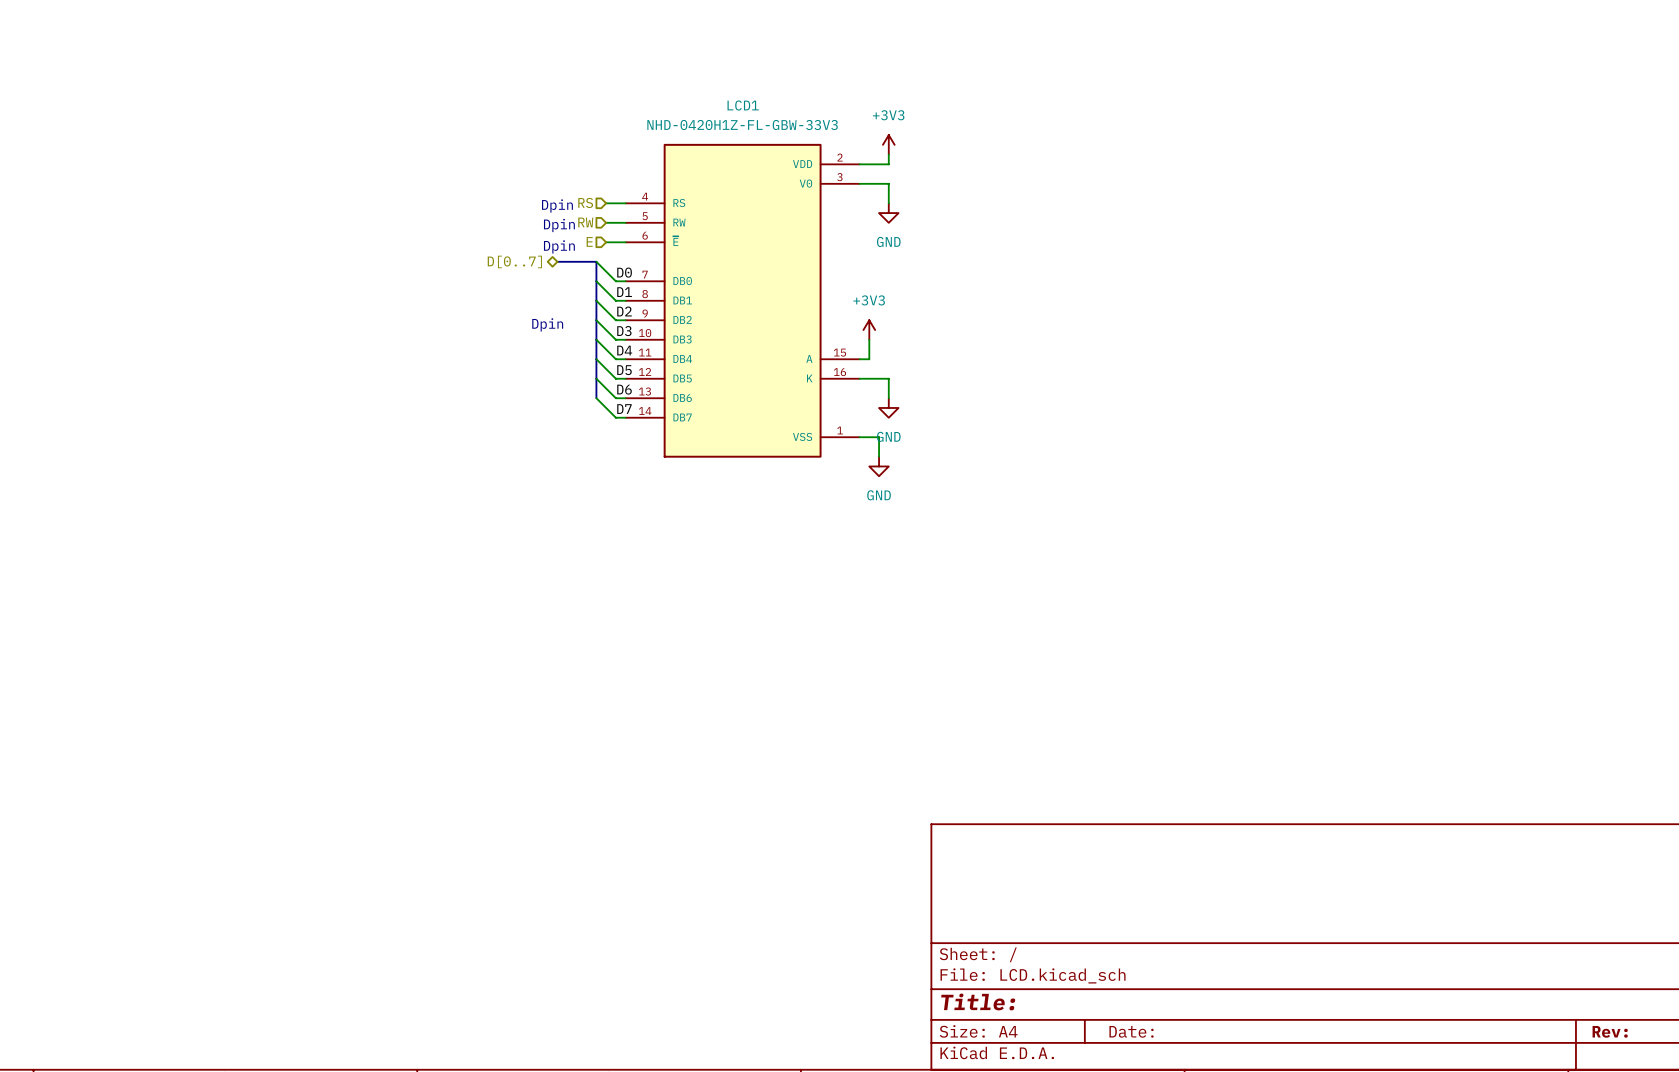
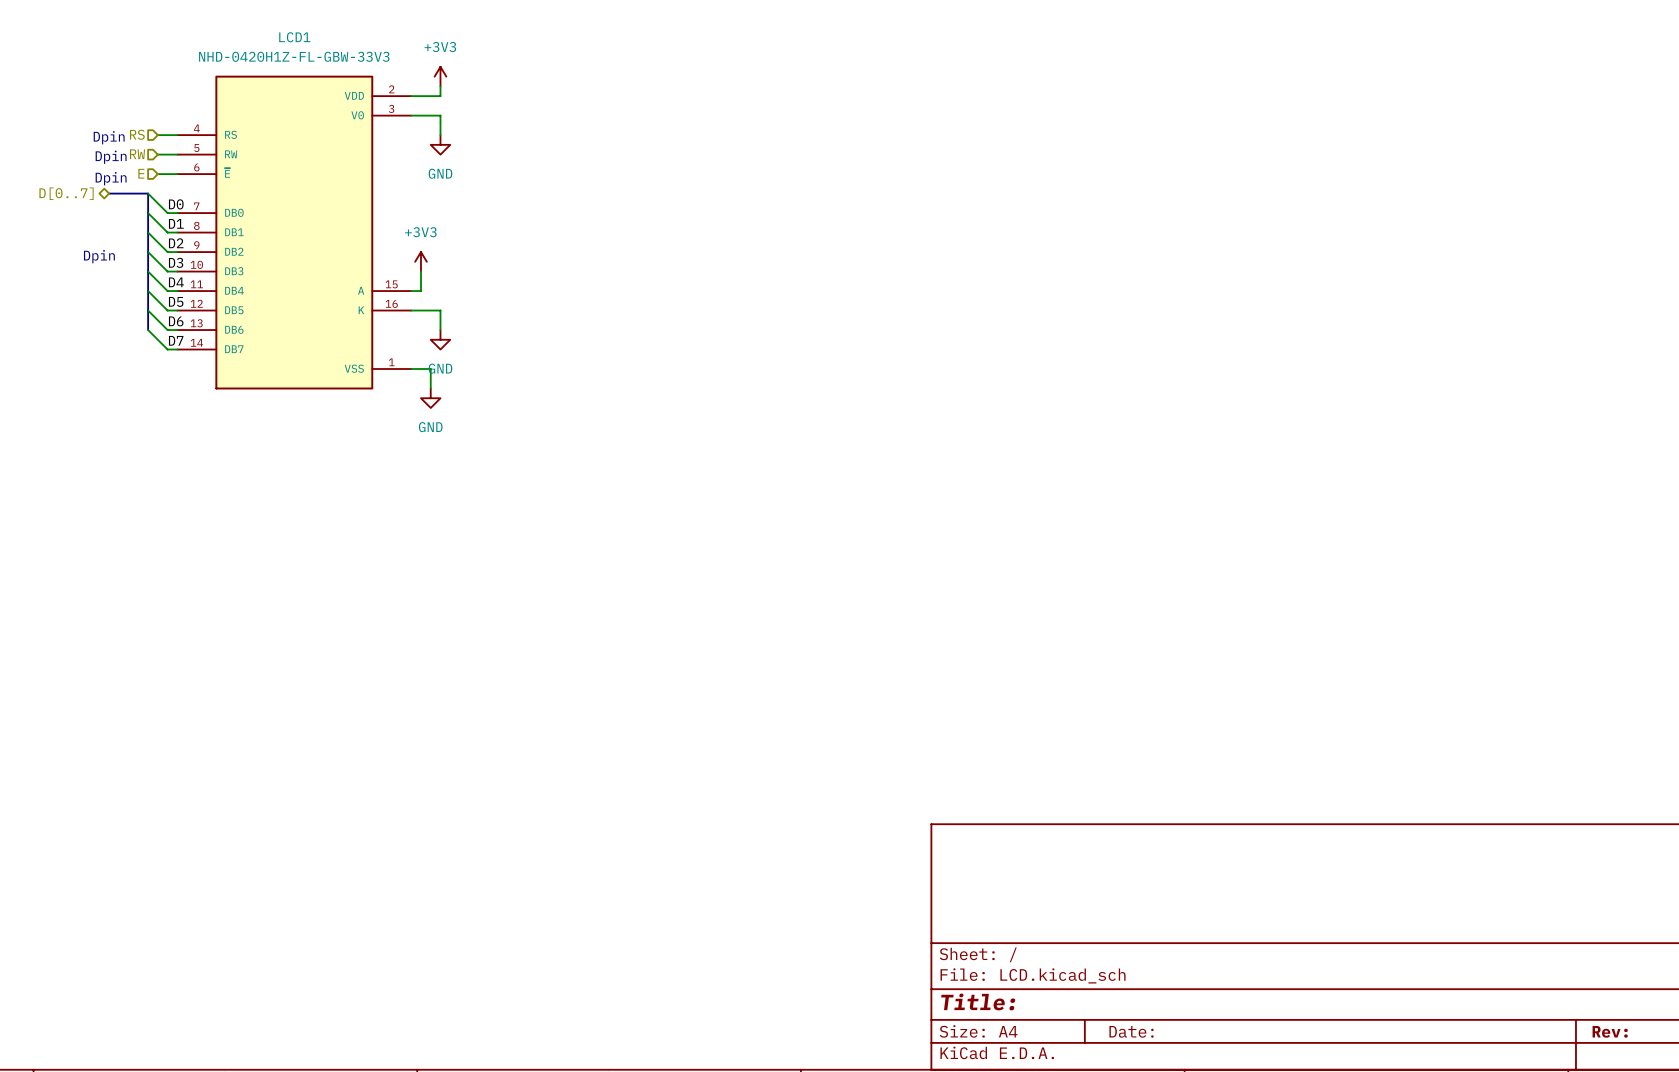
power symbol: none -> +3V3 (440, 76)
wire: none -> (440, 86) (440, 96) (411, 96)
wire: none -> (411, 115) (440, 115) (440, 135)
hierarchical label: none -> RS (137, 134)
wire: none -> (157, 135) (177, 135)
text: none -> Dpin (109, 137)
power symbol: none -> GND (440, 144)
power symbol: +3V3 (888, 144) -> none
hierarchical label: none -> RW (137, 154)
wire: none -> (157, 154) (177, 154)
wire: (888, 154) (888, 164) (859, 164) -> none
text: none -> Dpin (111, 157)
hierarchical label: none -> E (141, 173)
wire: none -> (157, 174) (177, 174)
text: none -> Dpin (111, 178)
wire: (859, 183) (888, 183) (888, 203) -> none
hierarchical label: none -> D[0..7] (66, 193)
bus: none -> (109, 193) (148, 193) (148, 330)
wire: none -> (148, 193) (167, 213) (177, 213)
hierarchical label: RS (585, 202) -> none
wire: (606, 203) (625, 203) -> none
label: none -> D0 (176, 204)
text: Dpin (557, 205) -> none
wire: none -> (148, 213) (167, 232) (177, 232)
power symbol: GND (888, 213) -> none
hierarchical label: RW (585, 222) -> none
wire: (606, 222) (625, 222) -> none
label: none -> D1 (176, 223)
text: Dpin (559, 225) -> none
wire: none -> (148, 232) (167, 252) (177, 252)
hierarchical label: E (589, 241) -> none
wire: (606, 242) (625, 242) -> none
label: none -> D2 (176, 243)
text: Dpin (559, 246) -> none
wire: none -> (148, 252) (167, 271) (177, 271)
text: none -> Dpin (99, 256)
power symbol: none -> +3V3 (421, 261)
hierarchical label: D[0..7] (514, 261) -> none
bus: (557, 261) (596, 261) (596, 398) -> none
wire: (596, 261) (615, 281) (625, 281) -> none
label: none -> D3 (176, 262)
wire: none -> (148, 271) (167, 291) (177, 291)
wire: none -> (421, 271) (421, 291) (411, 291)
label: D0 (624, 272) -> none
wire: (596, 281) (615, 300) (625, 300) -> none
label: none -> D4 (176, 282)
wire: none -> (148, 291) (167, 310) (177, 310)
label: D1 (624, 292) -> none
wire: (596, 300) (615, 320) (625, 320) -> none
LCD1 position: (742, 300) -> (294, 232)
label: none -> D5 (176, 301)
wire: none -> (148, 310) (167, 330) (177, 330)
wire: none -> (411, 310) (440, 310) (440, 330)
label: D2 (624, 311) -> none
wire: (596, 320) (615, 339) (625, 339) -> none
label: none -> D6 (176, 321)
text: Dpin (547, 324) -> none
wire: none -> (148, 330) (167, 349) (177, 349)
power symbol: +3V3 (869, 330) -> none
label: D3 (624, 331) -> none
power symbol: none -> GND (440, 339)
wire: (596, 339) (615, 359) (625, 359) -> none
wire: (869, 339) (869, 359) (859, 359) -> none
label: none -> D7 (176, 340)
label: D4 (624, 350) -> none
wire: (596, 359) (615, 378) (625, 378) -> none
wire: none -> (411, 369) (430, 369) (430, 388)
label: D5 (624, 370) -> none
wire: (596, 378) (615, 398) (625, 398) -> none
wire: (859, 378) (888, 378) (888, 398) -> none
label: D6 (624, 389) -> none
power symbol: none -> GND (430, 398)
wire: (596, 398) (615, 417) (625, 417) -> none
power symbol: GND (888, 407) -> none
label: D7 (624, 409) -> none
wire: (859, 437) (879, 437) (879, 456) -> none
power symbol: GND (879, 466) -> none

